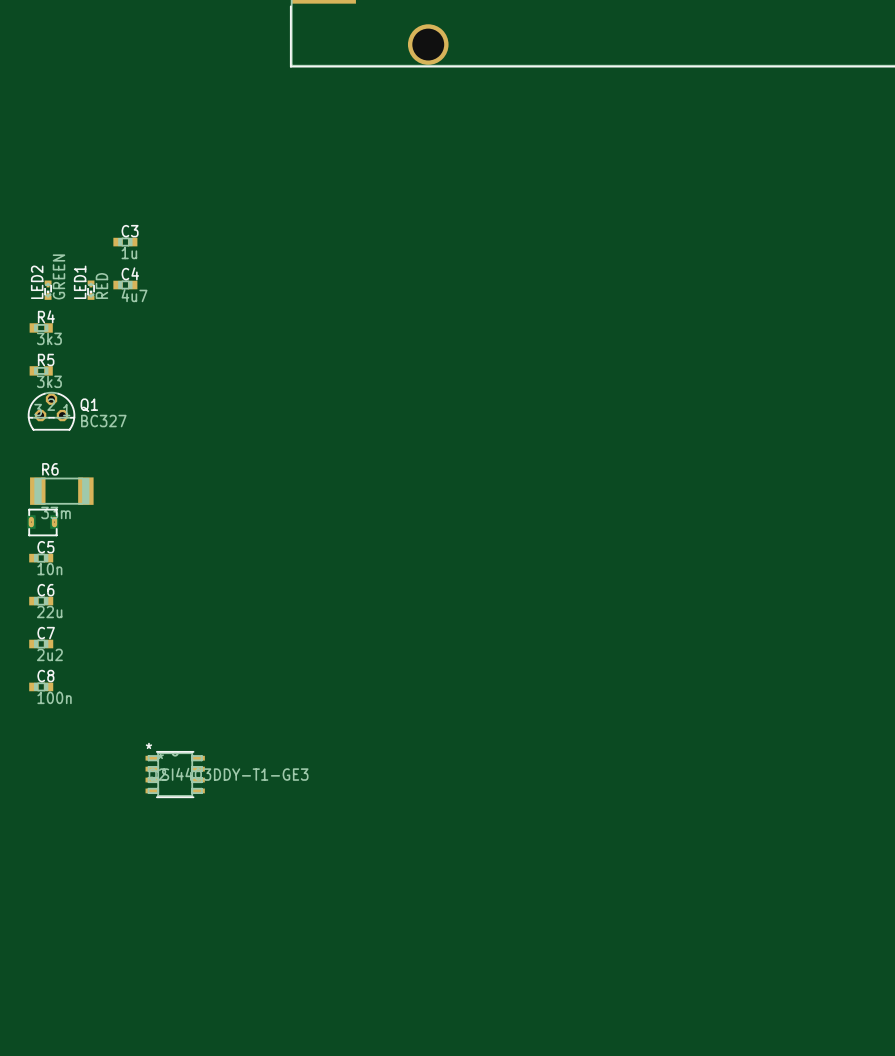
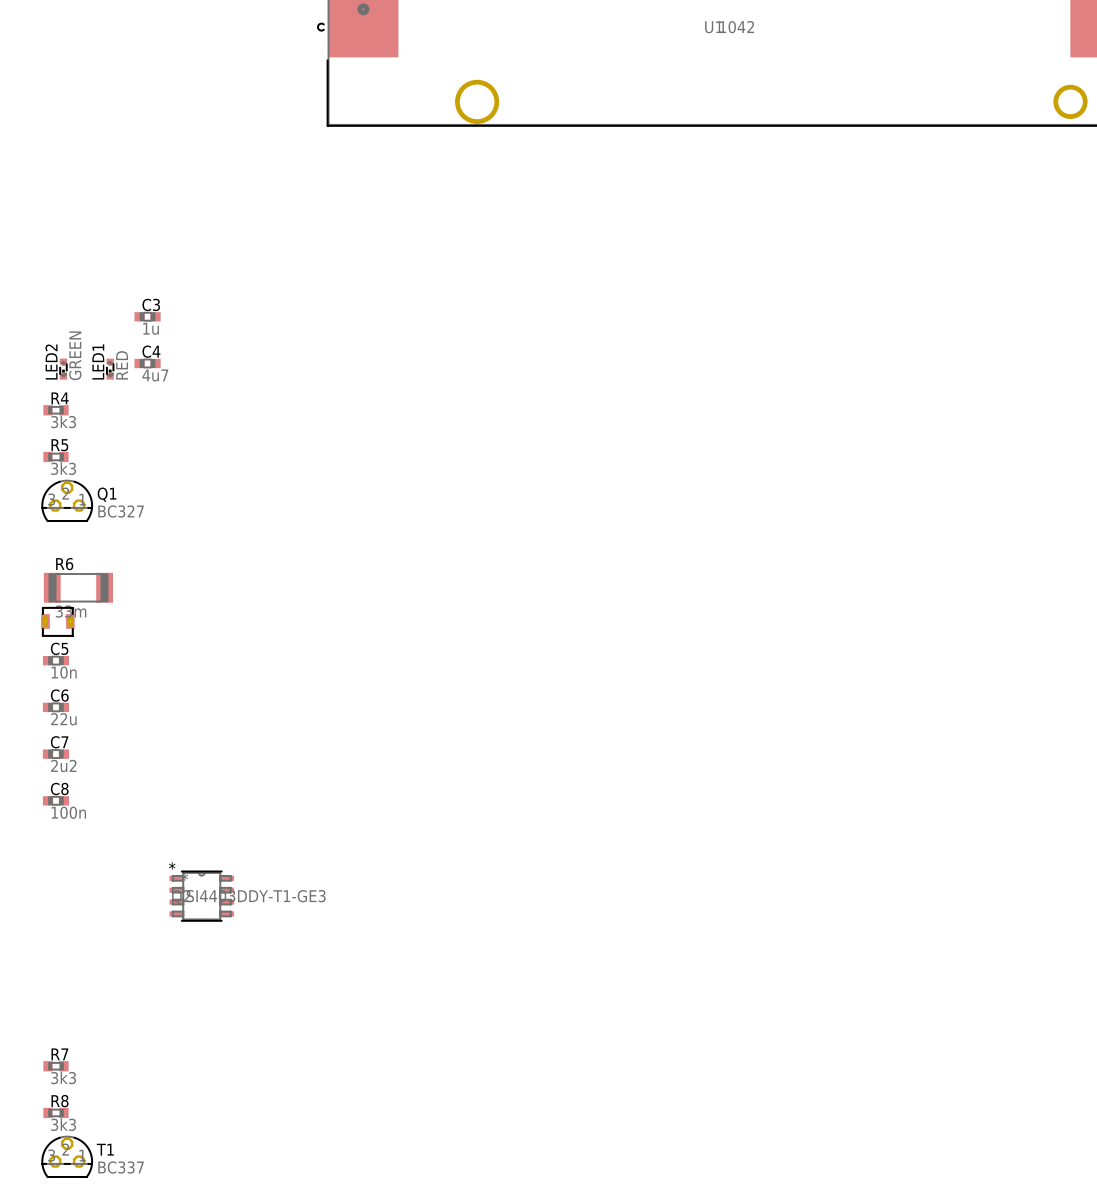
R7: none -> 3k3 (55, 1066)
R8: none -> 3k3 (55, 1112)
T1: none -> BC337 (67, 1156)

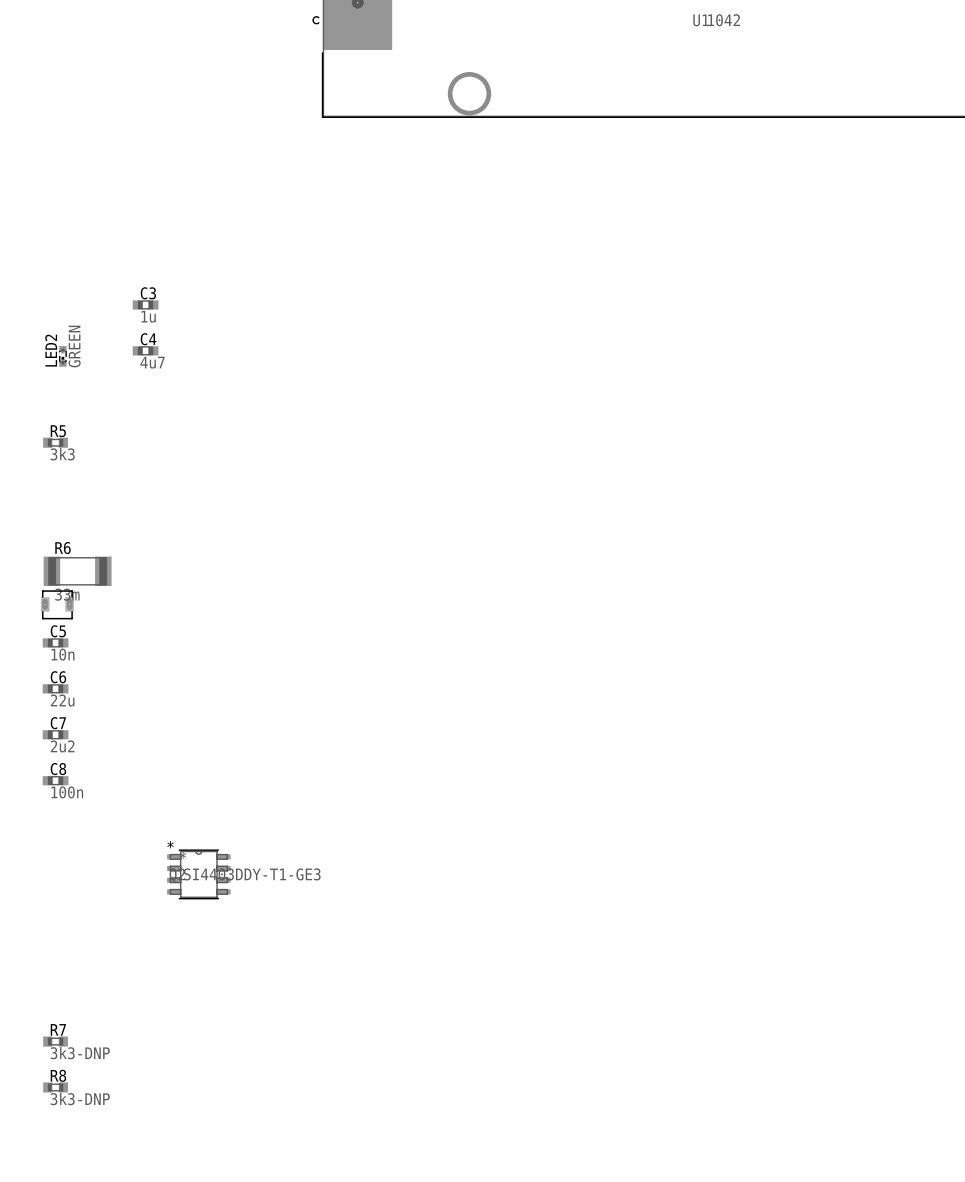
LED1: RED (110, 369) -> none
R4: 3k3 (55, 410) -> none
Q1: BC327 (67, 500) -> none
R7 value: 3k3 (63, 1077) -> 3k3-DNP (80, 1053)
R8 value: 3k3 (63, 1124) -> 3k3-DNP (80, 1099)
T1: BC337 (67, 1156) -> none

